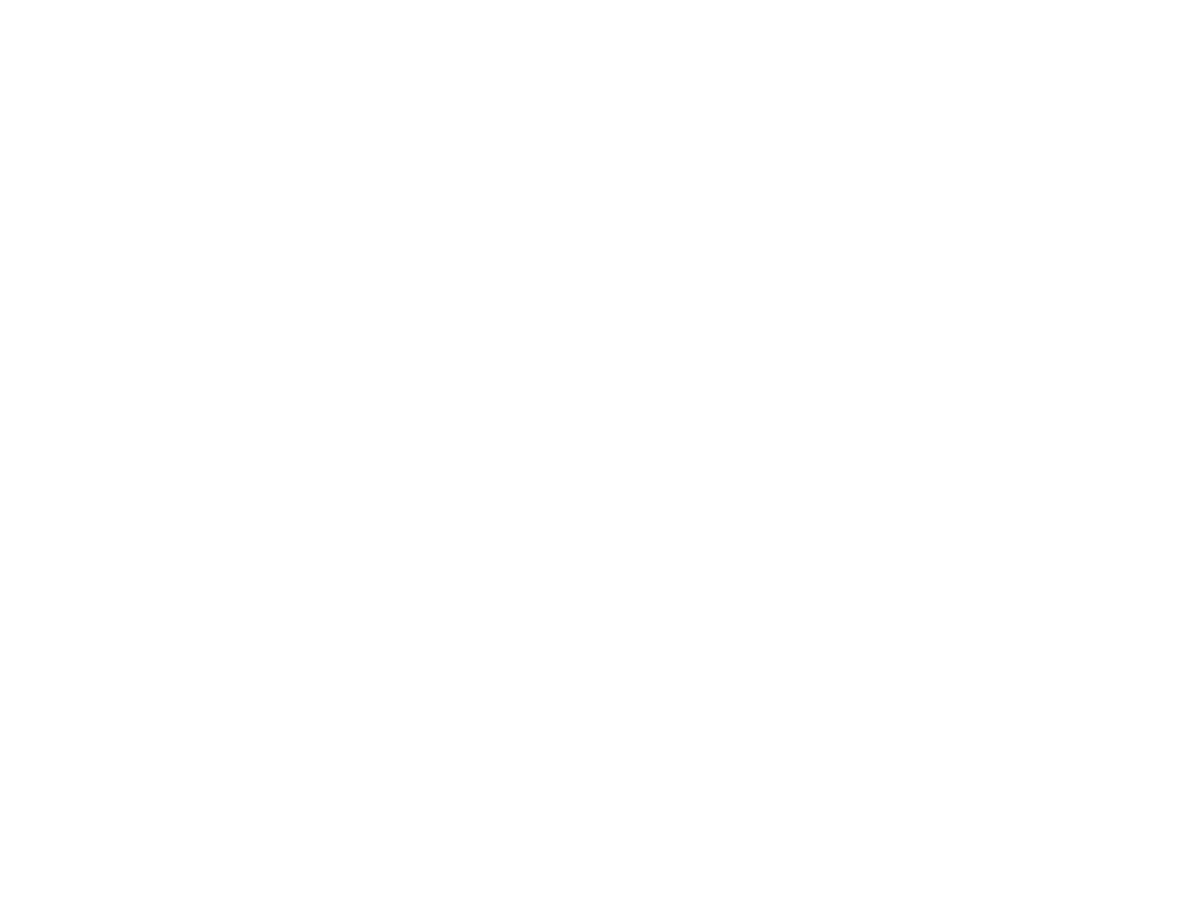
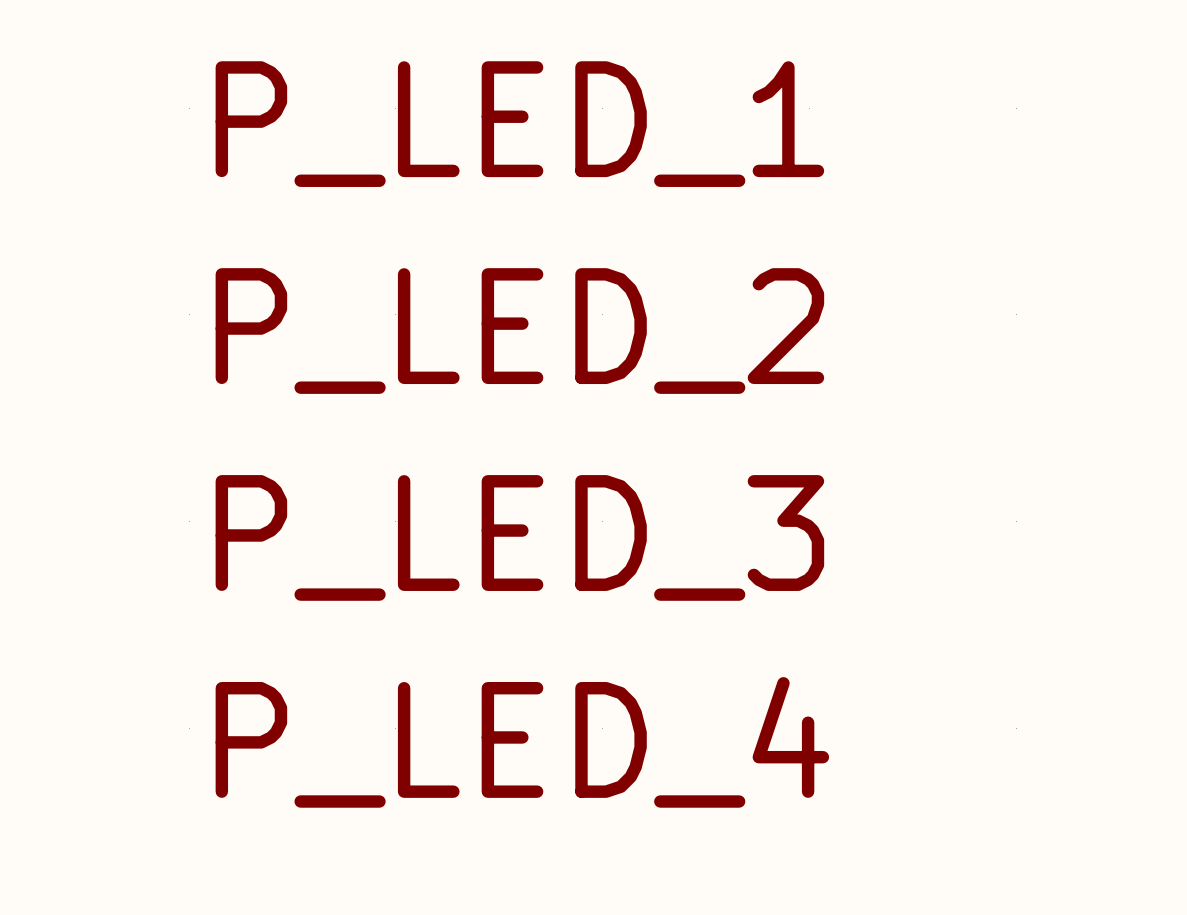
label: none -> P_LED_1 (519, 124)
label: none -> P_LED_2 (519, 331)
label: none -> P_LED_3 (519, 537)
label: none -> P_LED_4 (522, 742)

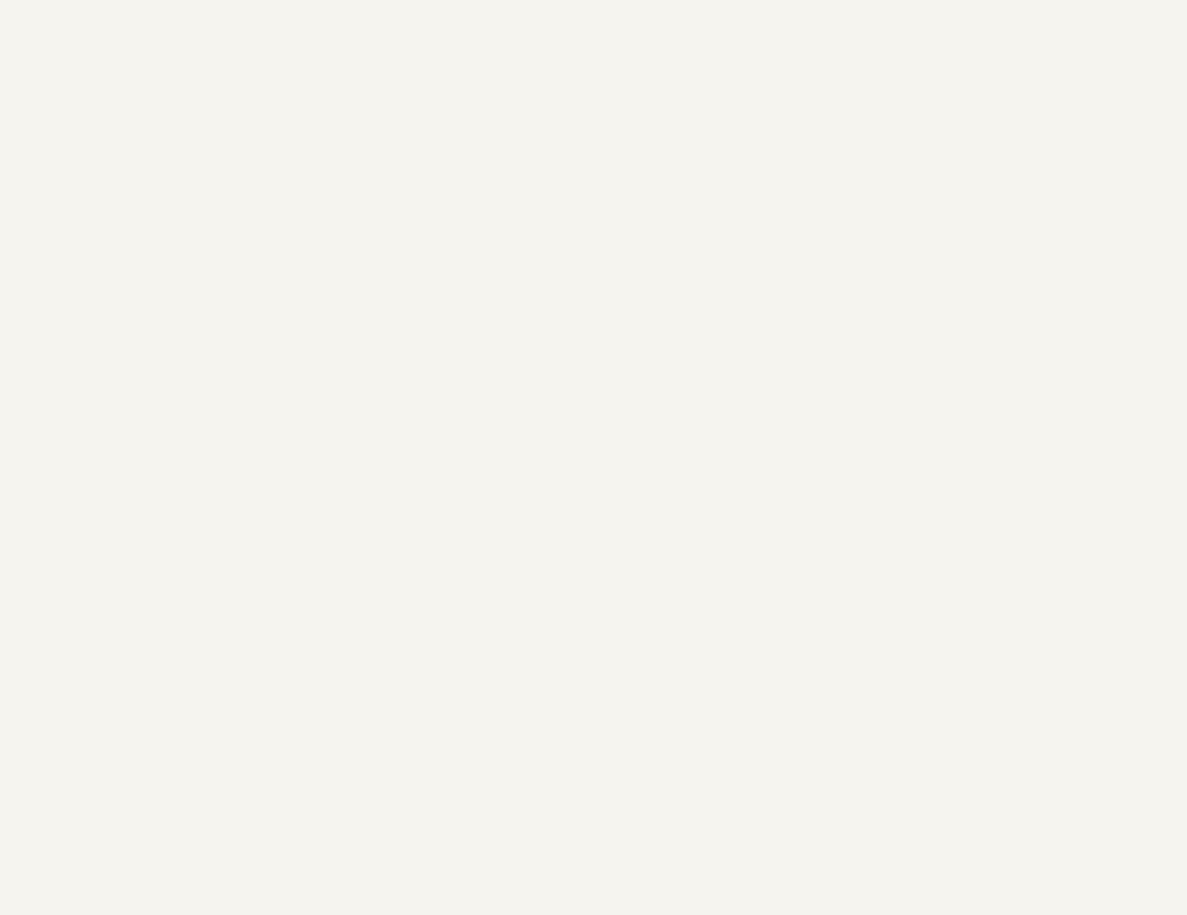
label: P_LED_1 (519, 124) -> none
label: P_LED_2 (519, 331) -> none
label: P_LED_3 (519, 537) -> none
label: P_LED_4 (522, 742) -> none

